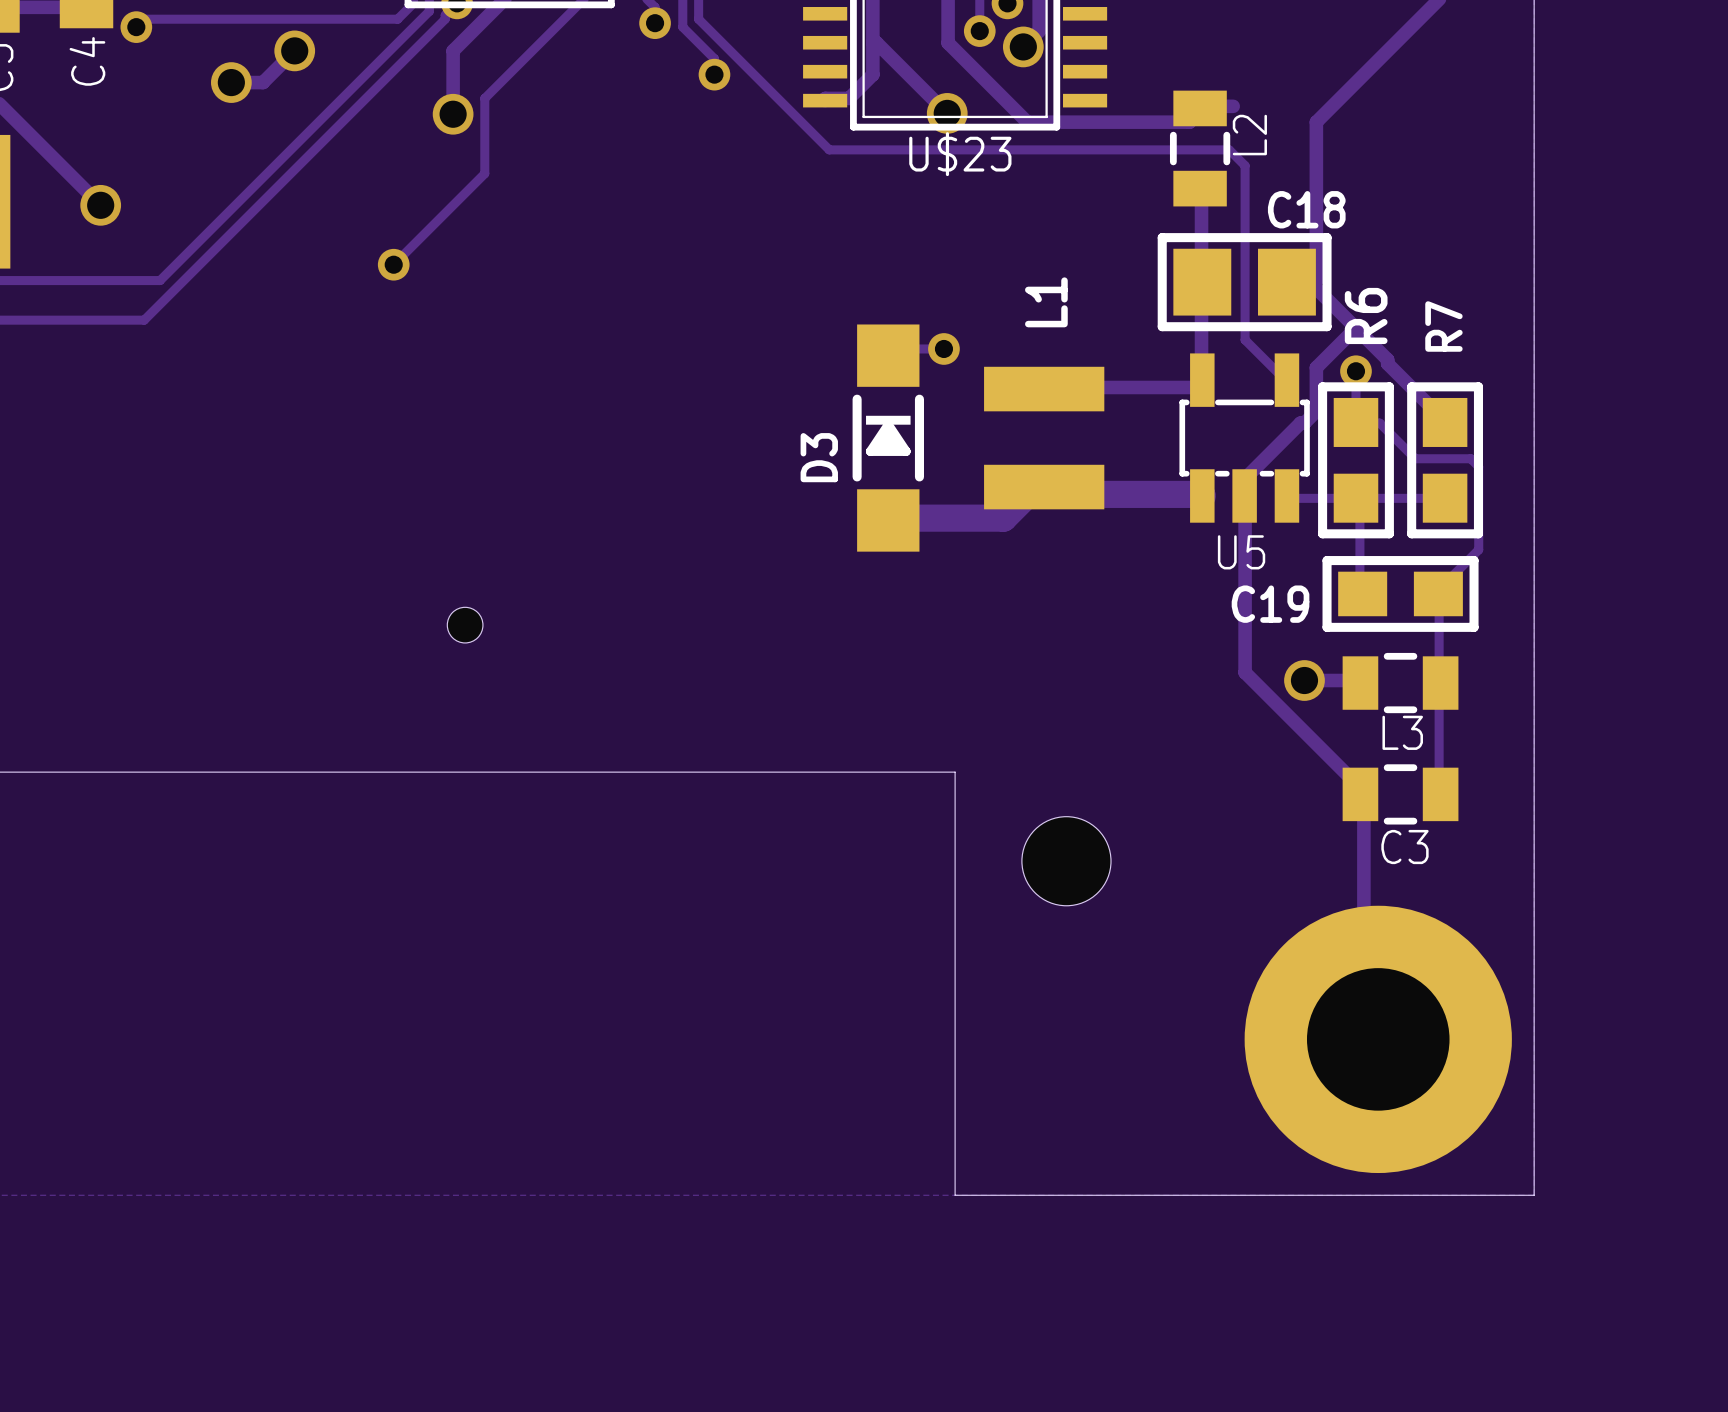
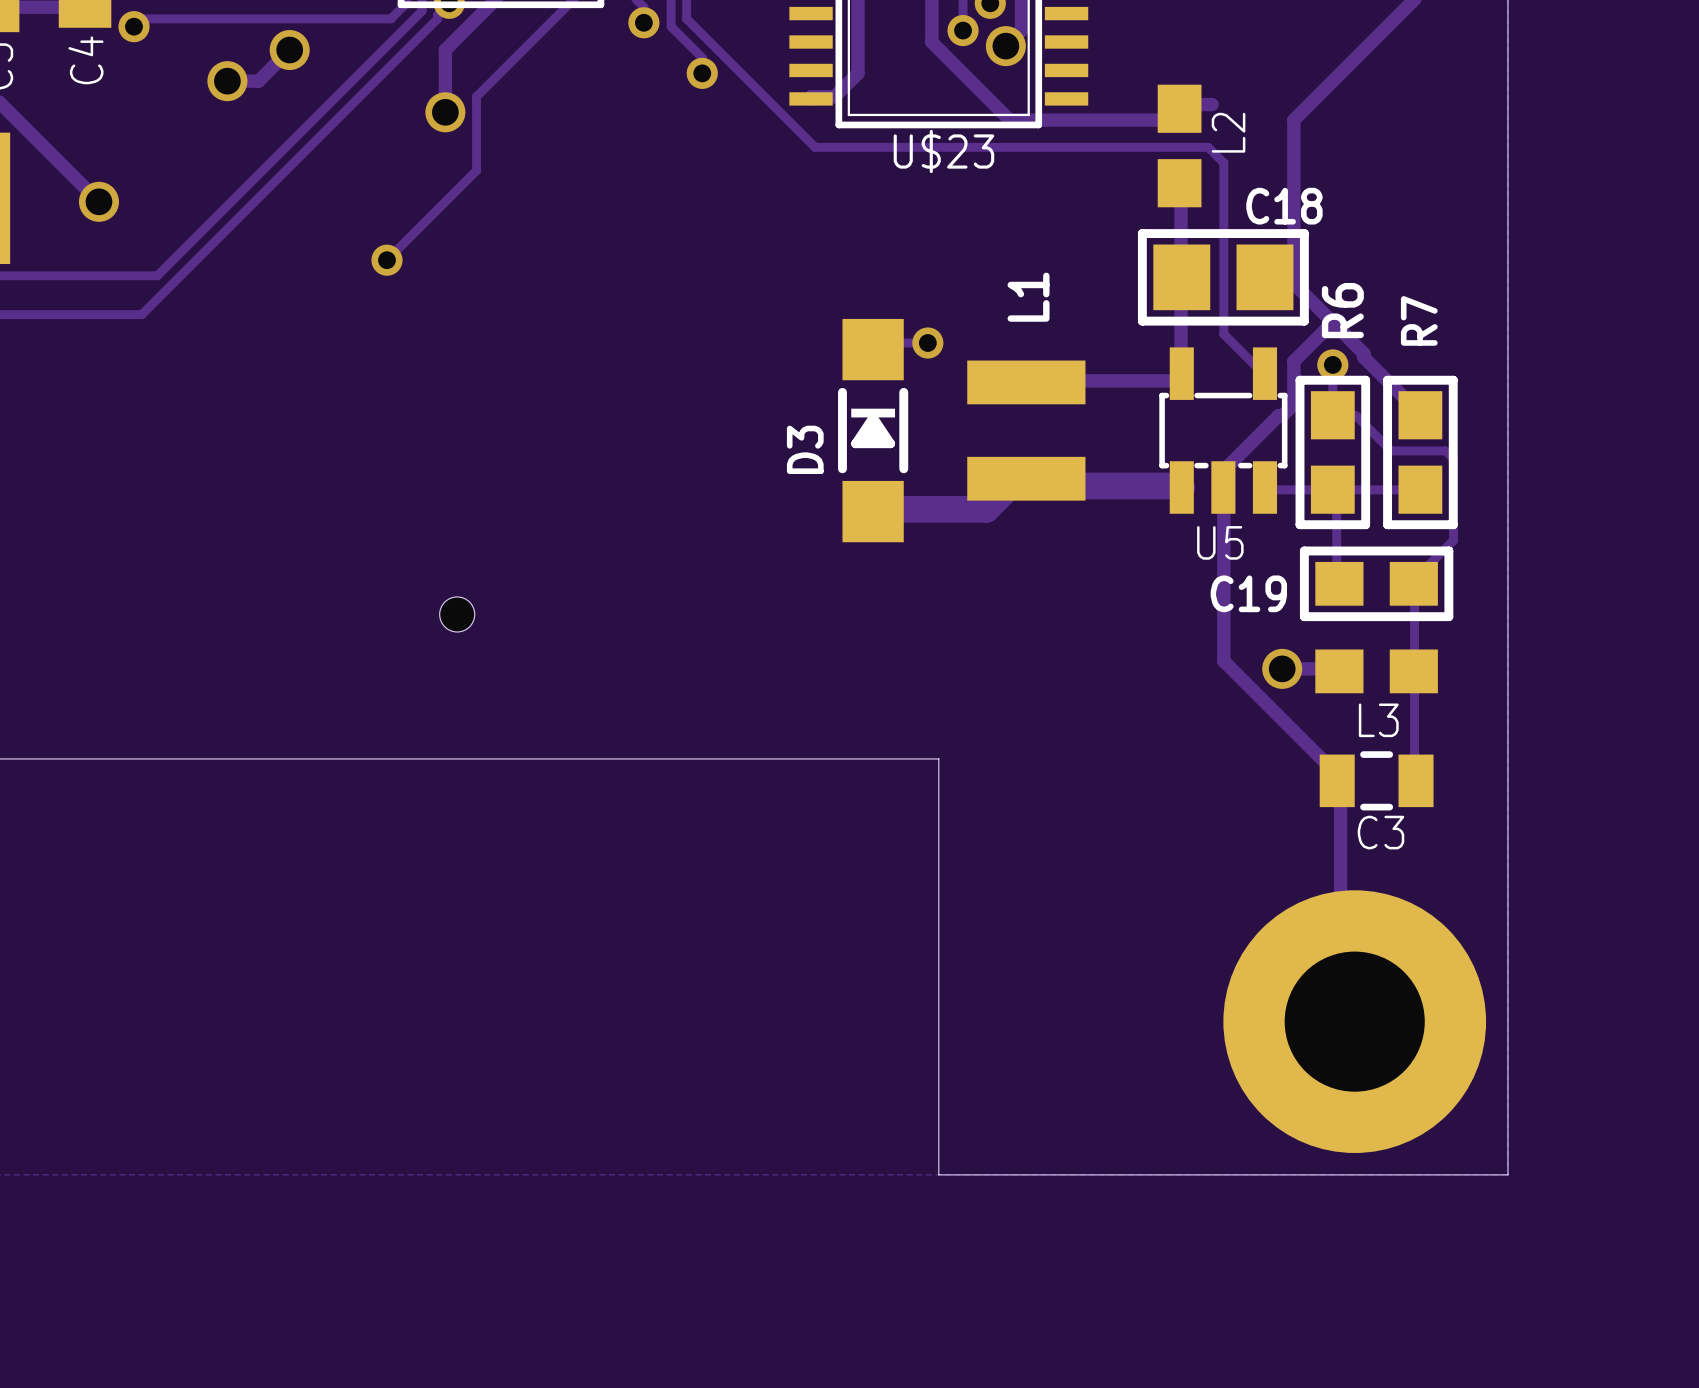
track: (872, 42) (876, 42) (947, 113) -> none
L2 footprint: [1169, 90, 1231, 207] -> [1157, 84, 1202, 208]
via: (947, 113) -> none
L3 footprint: [1342, 652, 1459, 714] -> [1315, 649, 1438, 694]
hole: (1066, 861) -> none

